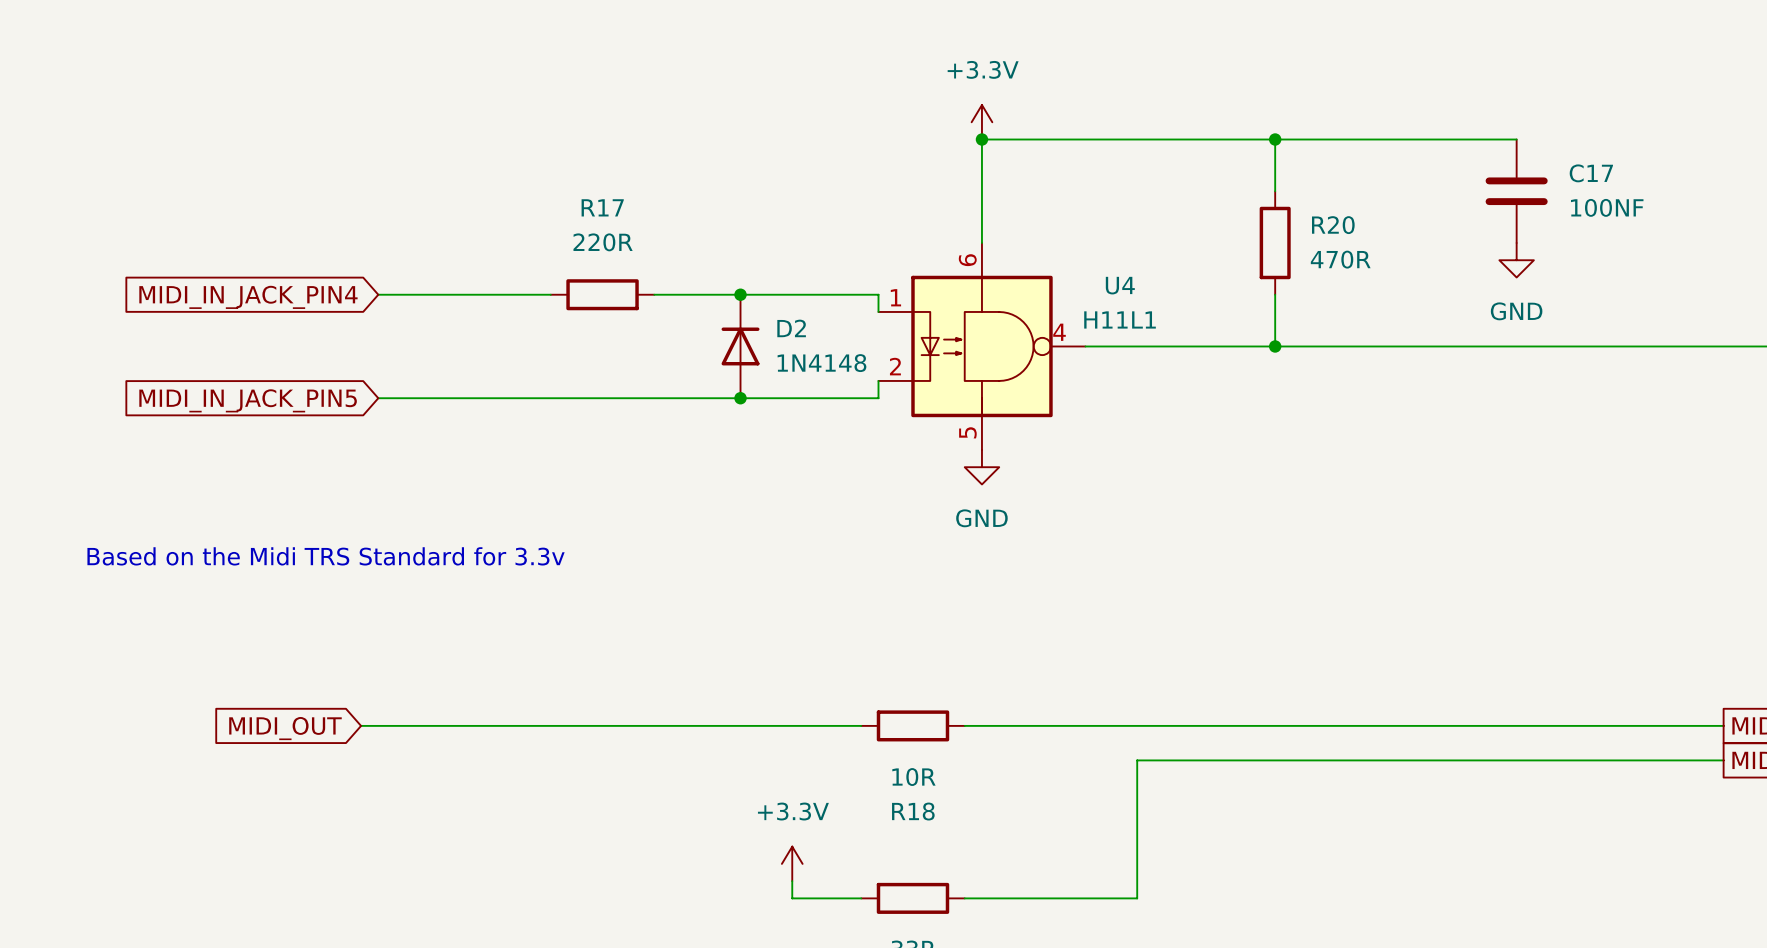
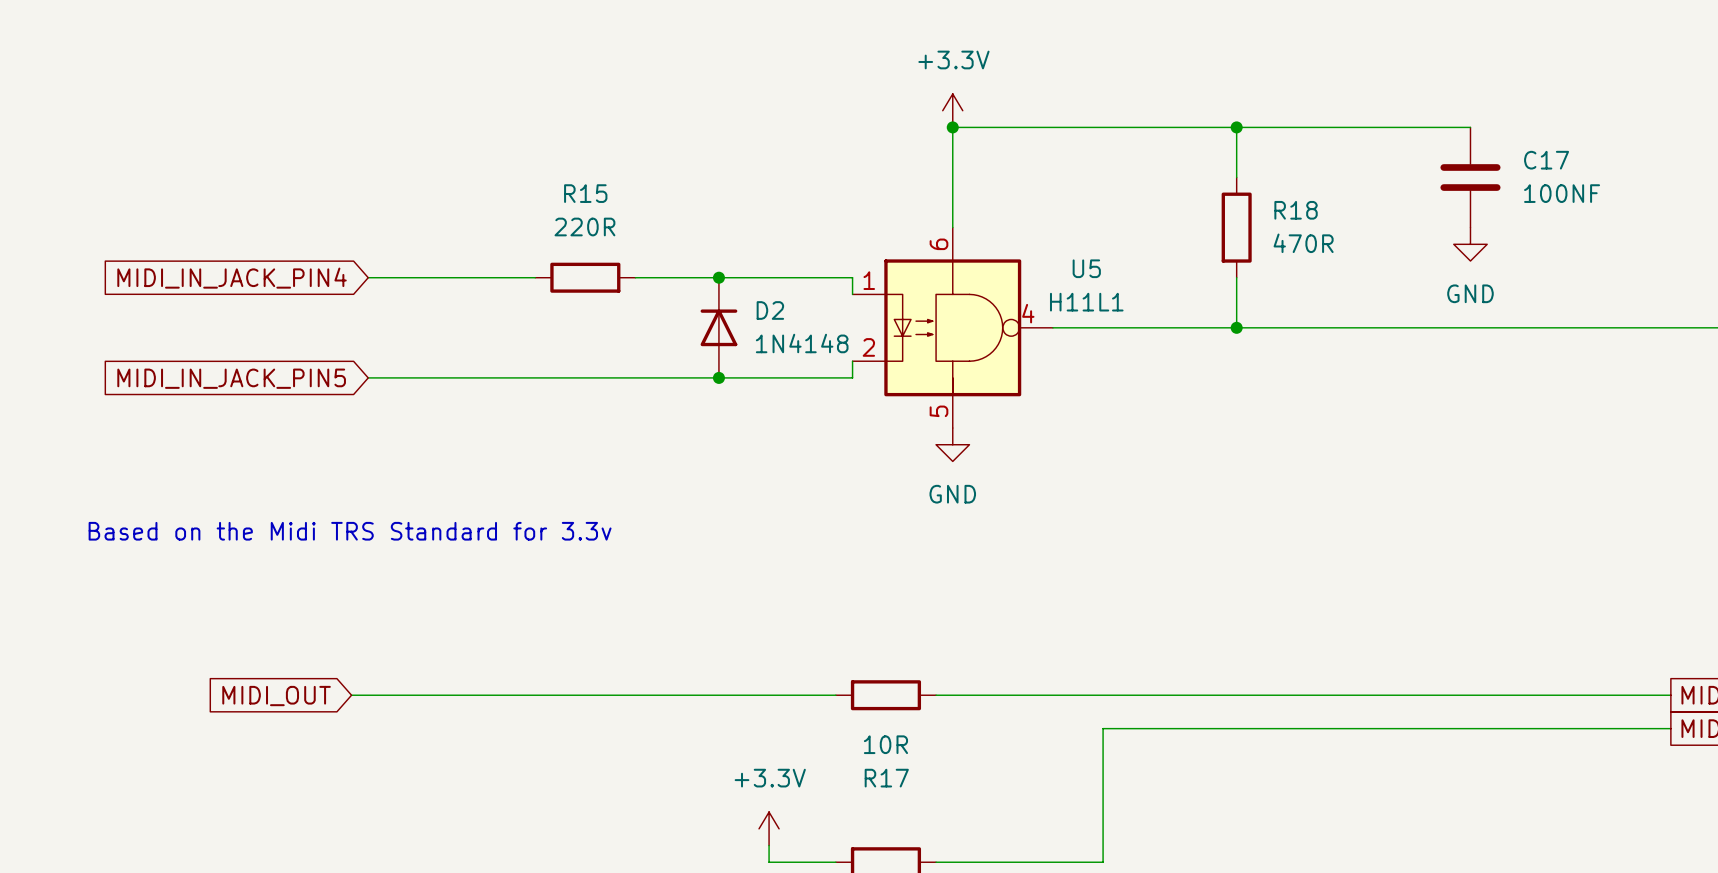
R17 name: R17 (602, 207) -> R15 (585, 193)
R20 name: R20 (1333, 225) -> R18 (1296, 210)
U4 name: U4 (1120, 285) -> U5 (1086, 268)
R18 name: R18 (913, 811) -> R17 (886, 778)

